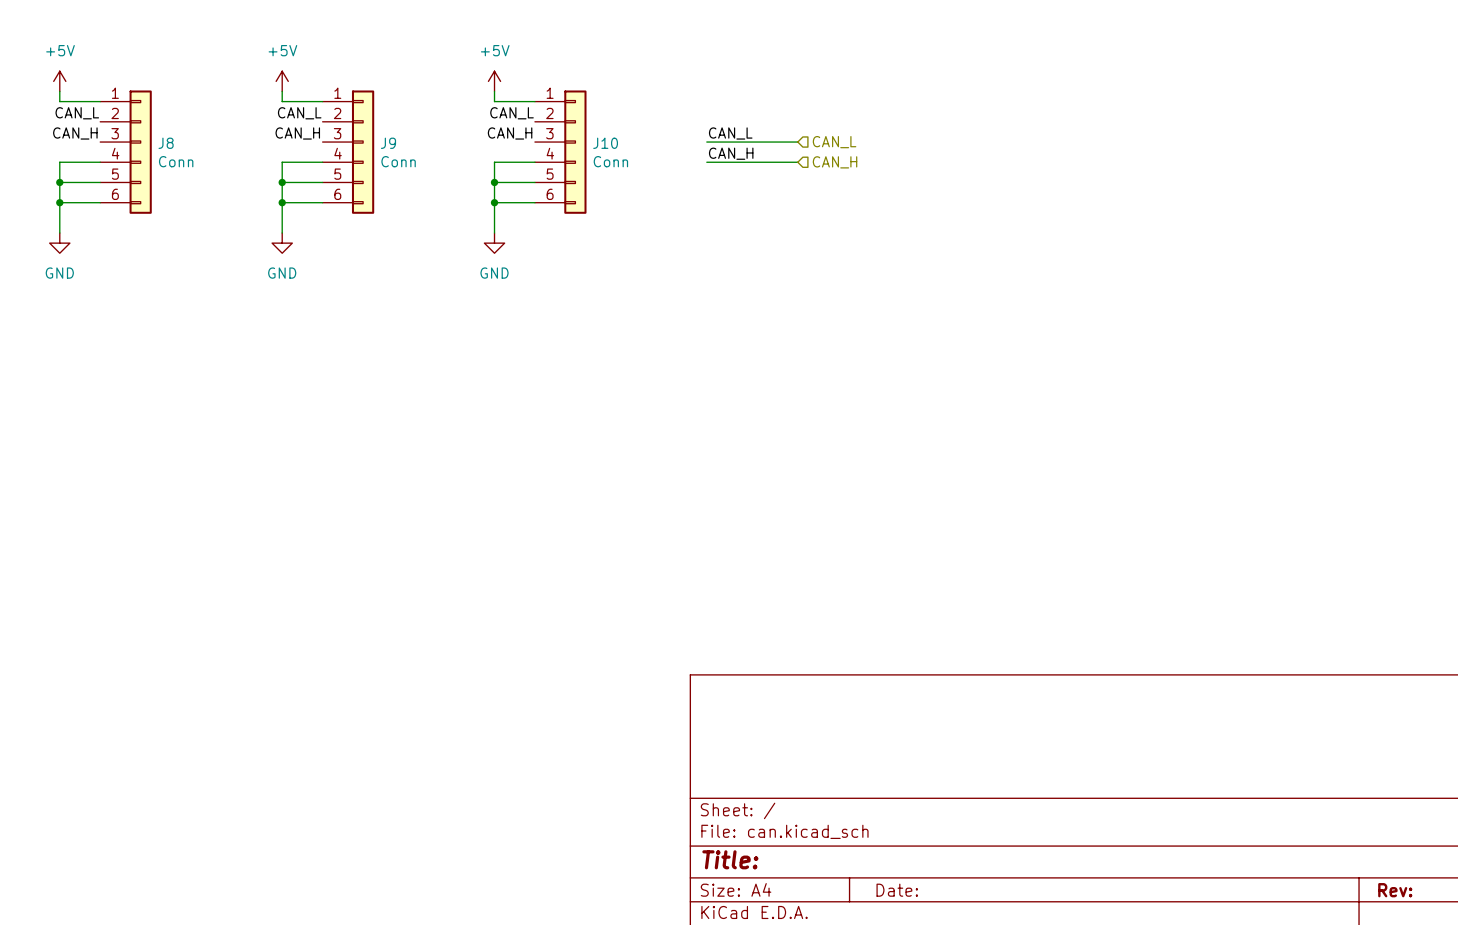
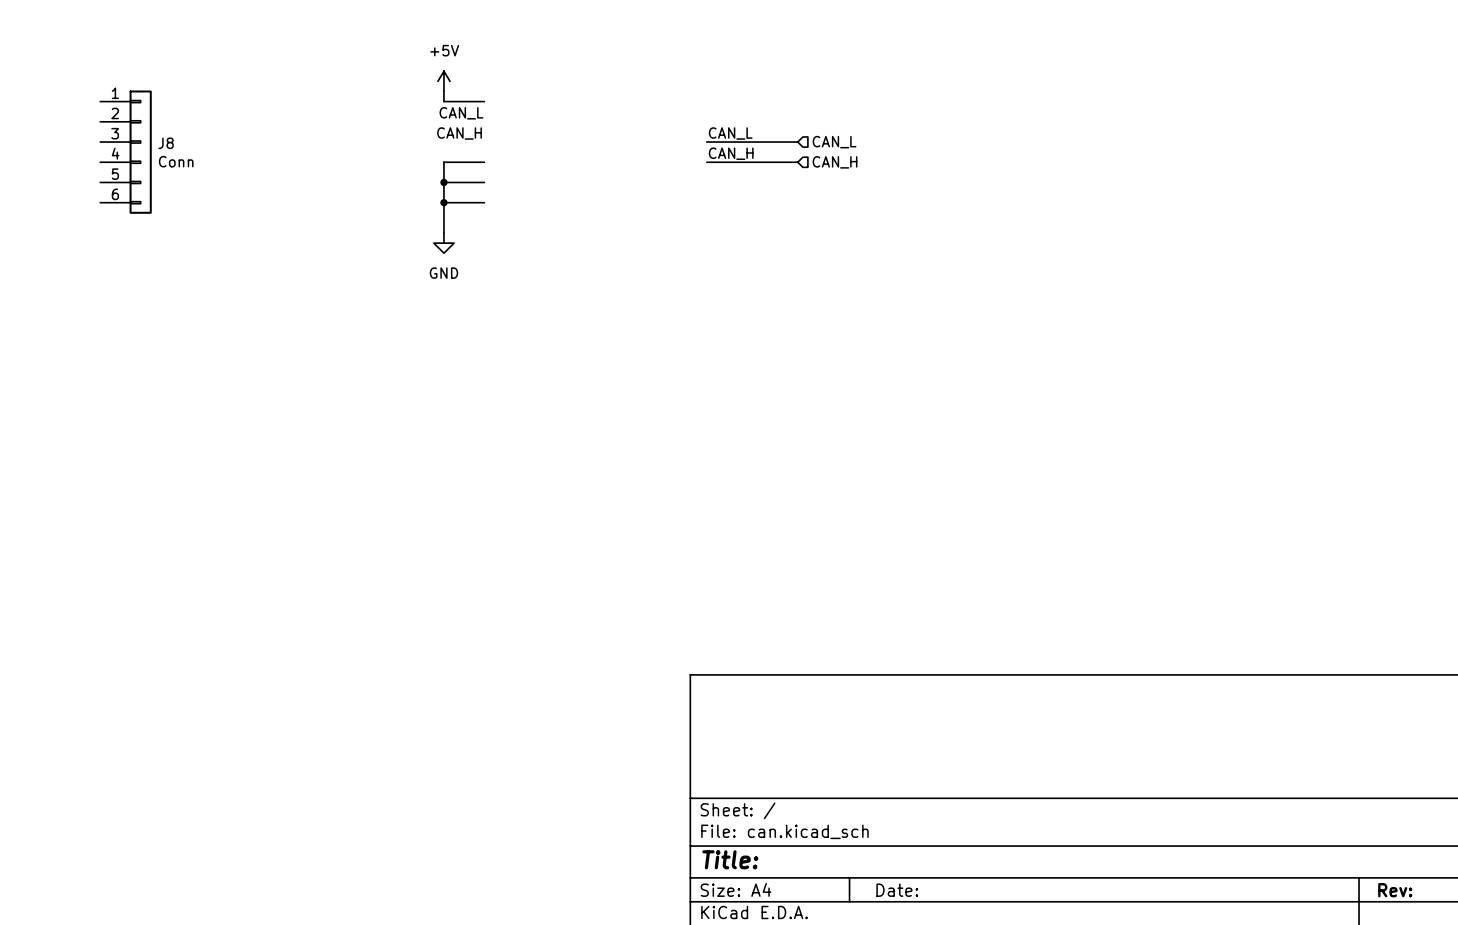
power symbol: +5V (59, 81) -> none
power symbol: +5V (282, 81) -> none
power symbol position: +5V (494, 81) -> +5V (443, 81)
wire: (59, 91) (59, 101) (100, 101) -> none
wire: (282, 91) (282, 101) (322, 101) -> none
wire: (494, 91) (494, 101) (534, 101) -> (443, 91) (443, 101) (484, 101)
label: CAN_L (77, 113) -> none
label: CAN_L (299, 113) -> none
label position: CAN_L (512, 113) -> CAN_L (461, 113)
label: CAN_H (75, 133) -> none
label: CAN_H (297, 133) -> none
label position: CAN_H (510, 133) -> CAN_H (459, 133)
J9: Conn (348, 152) -> none
J10: Conn (560, 152) -> none
wire: (100, 162) (59, 162) (59, 233) -> none
wire: (322, 162) (282, 162) (282, 233) -> none
wire: (534, 162) (494, 162) (494, 233) -> (484, 162) (443, 162) (443, 233)
wire: (59, 182) (100, 182) -> none
junction: (59, 182) -> none
wire: (282, 182) (322, 182) -> none
junction: (282, 182) -> none
junction: none -> (443, 182)
wire: (494, 182) (534, 182) -> (443, 182) (484, 182)
junction: (494, 182) -> none
wire: (59, 202) (100, 202) -> none
junction: (59, 202) -> none
wire: (282, 202) (322, 202) -> none
junction: (282, 202) -> none
junction: none -> (443, 202)
wire: (494, 202) (534, 202) -> (443, 202) (484, 202)
junction: (494, 202) -> none
power symbol: GND (59, 243) -> none
power symbol: GND (282, 243) -> none
power symbol position: GND (494, 243) -> GND (443, 243)

